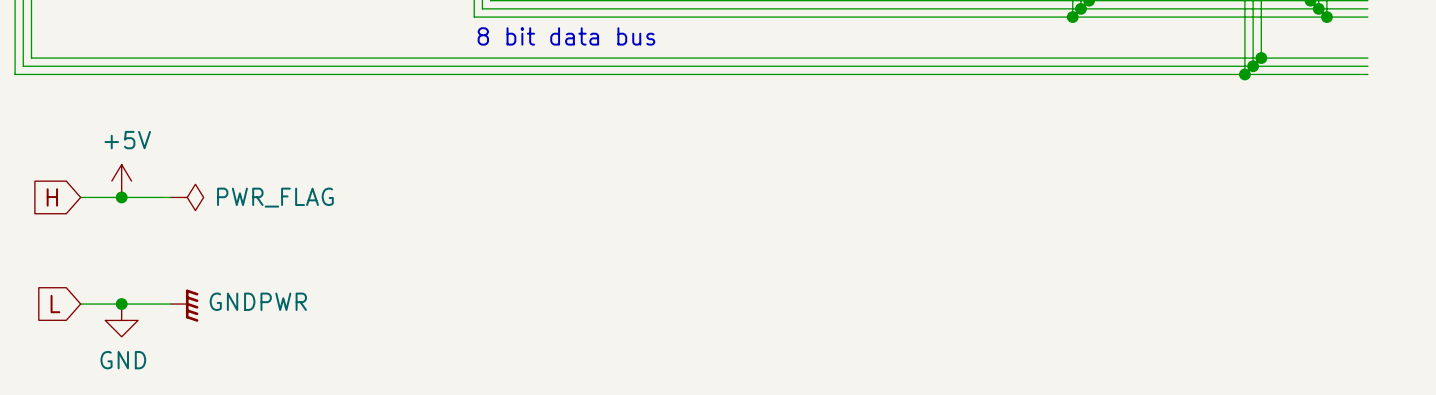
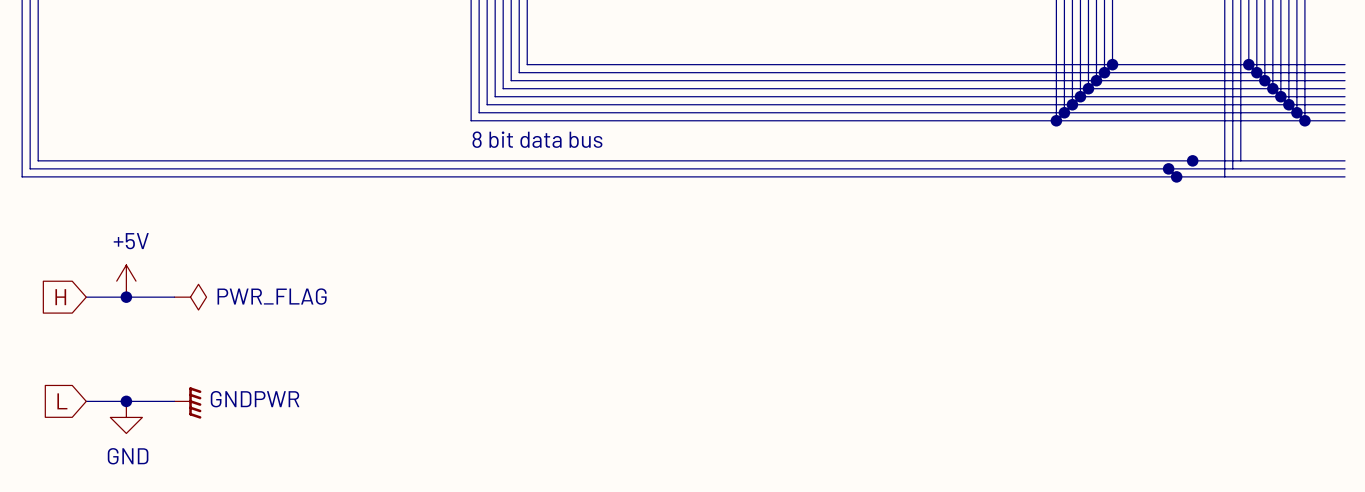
junction: none -> (1192, 160)
junction: (1261, 58) -> none
junction: none -> (1168, 168)
junction: (1253, 66) -> none
junction: none -> (1176, 176)
junction: (1244, 74) -> none

